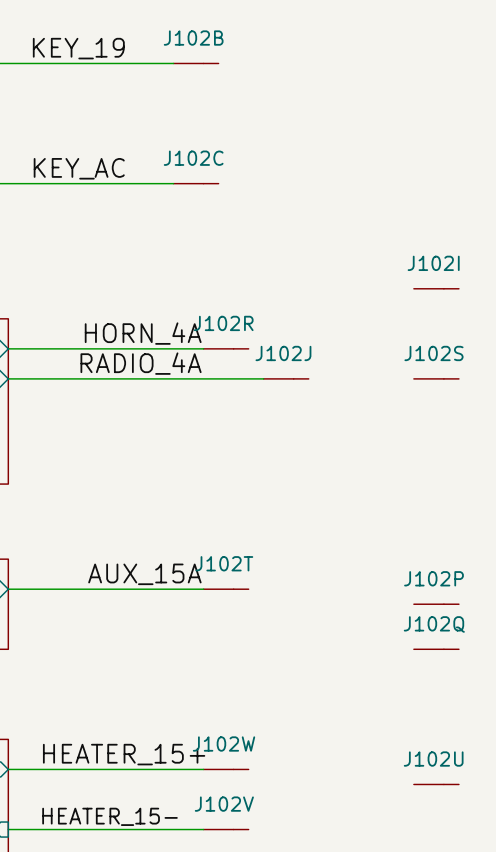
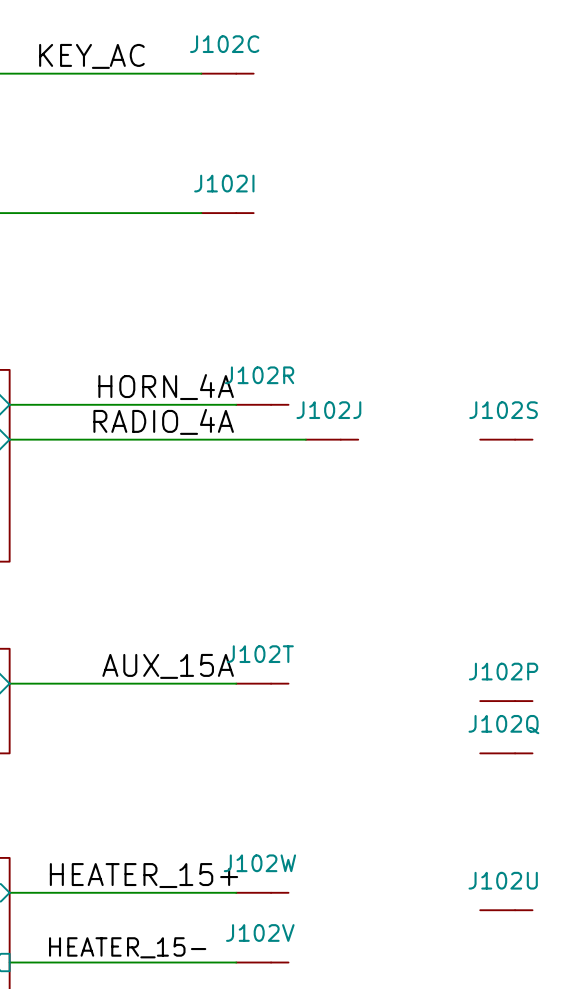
J102B name: J102B (193, 38) -> J102C (224, 44)
label: KEY_19 (78, 48) -> KEY_AC (91, 56)
J102C name: J102C (193, 158) -> J102I (224, 183)
label: KEY_AC (79, 168) -> none
J102I: (436, 288) -> none

